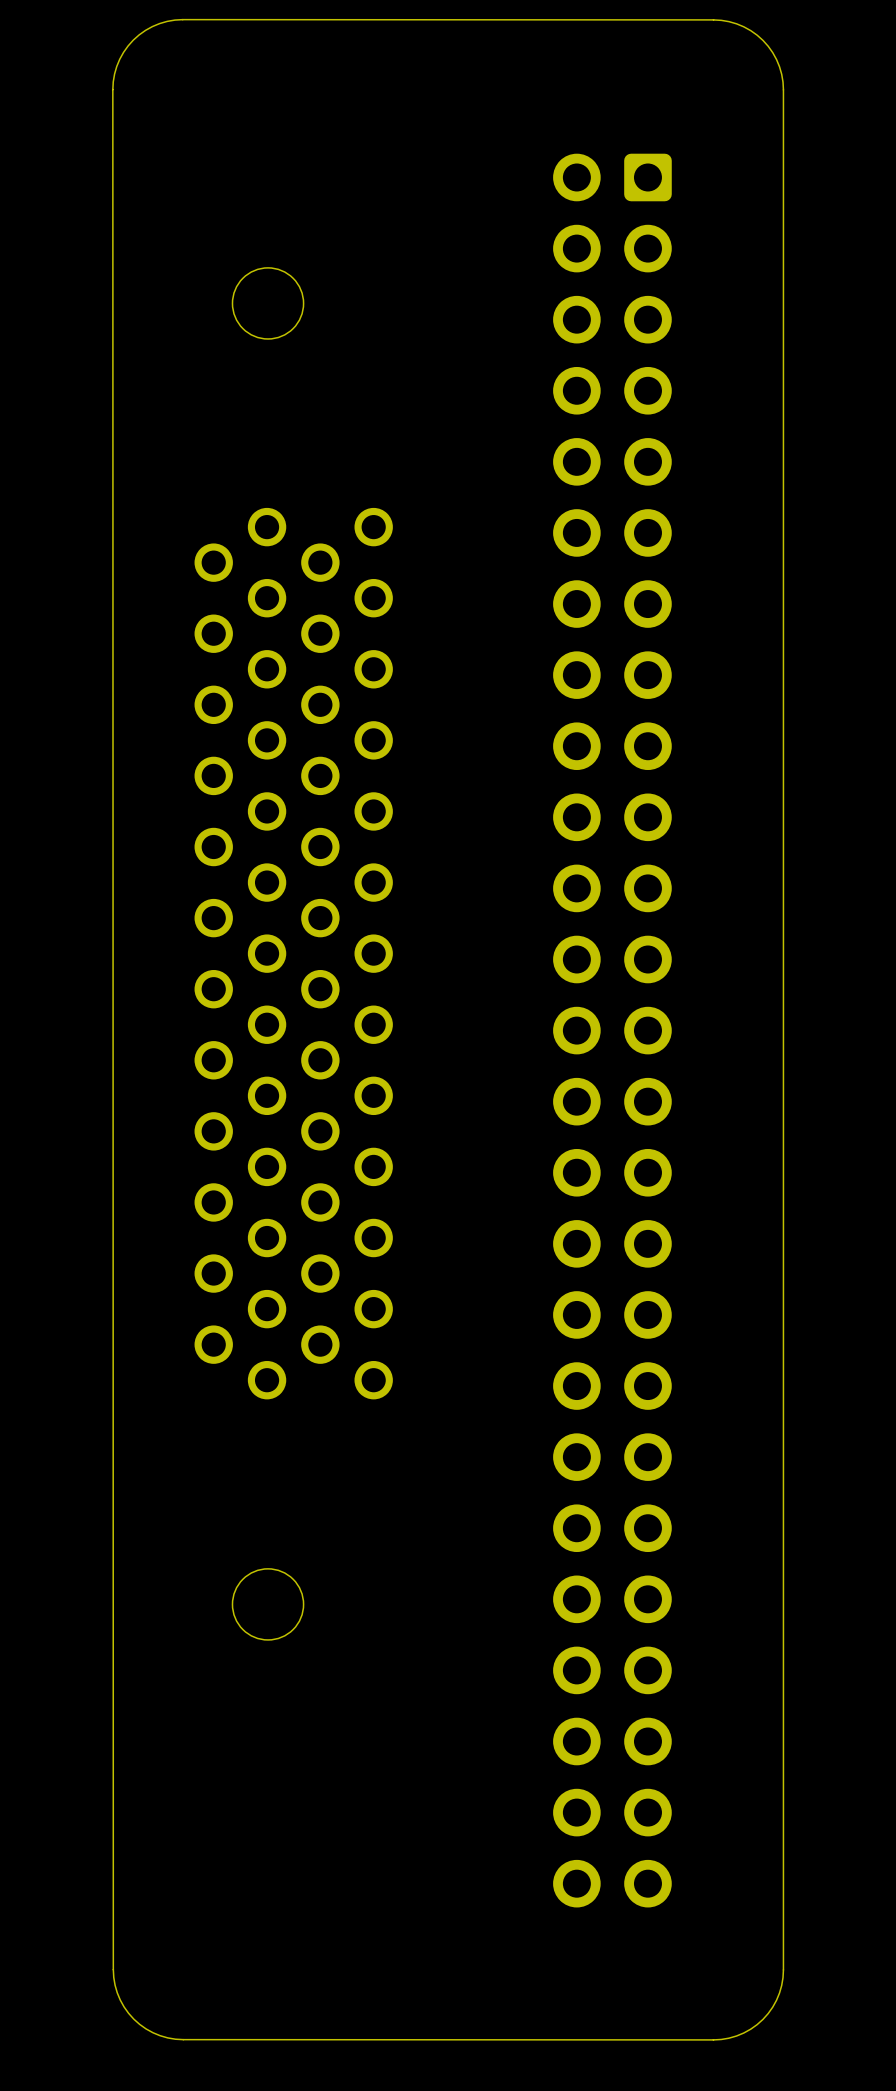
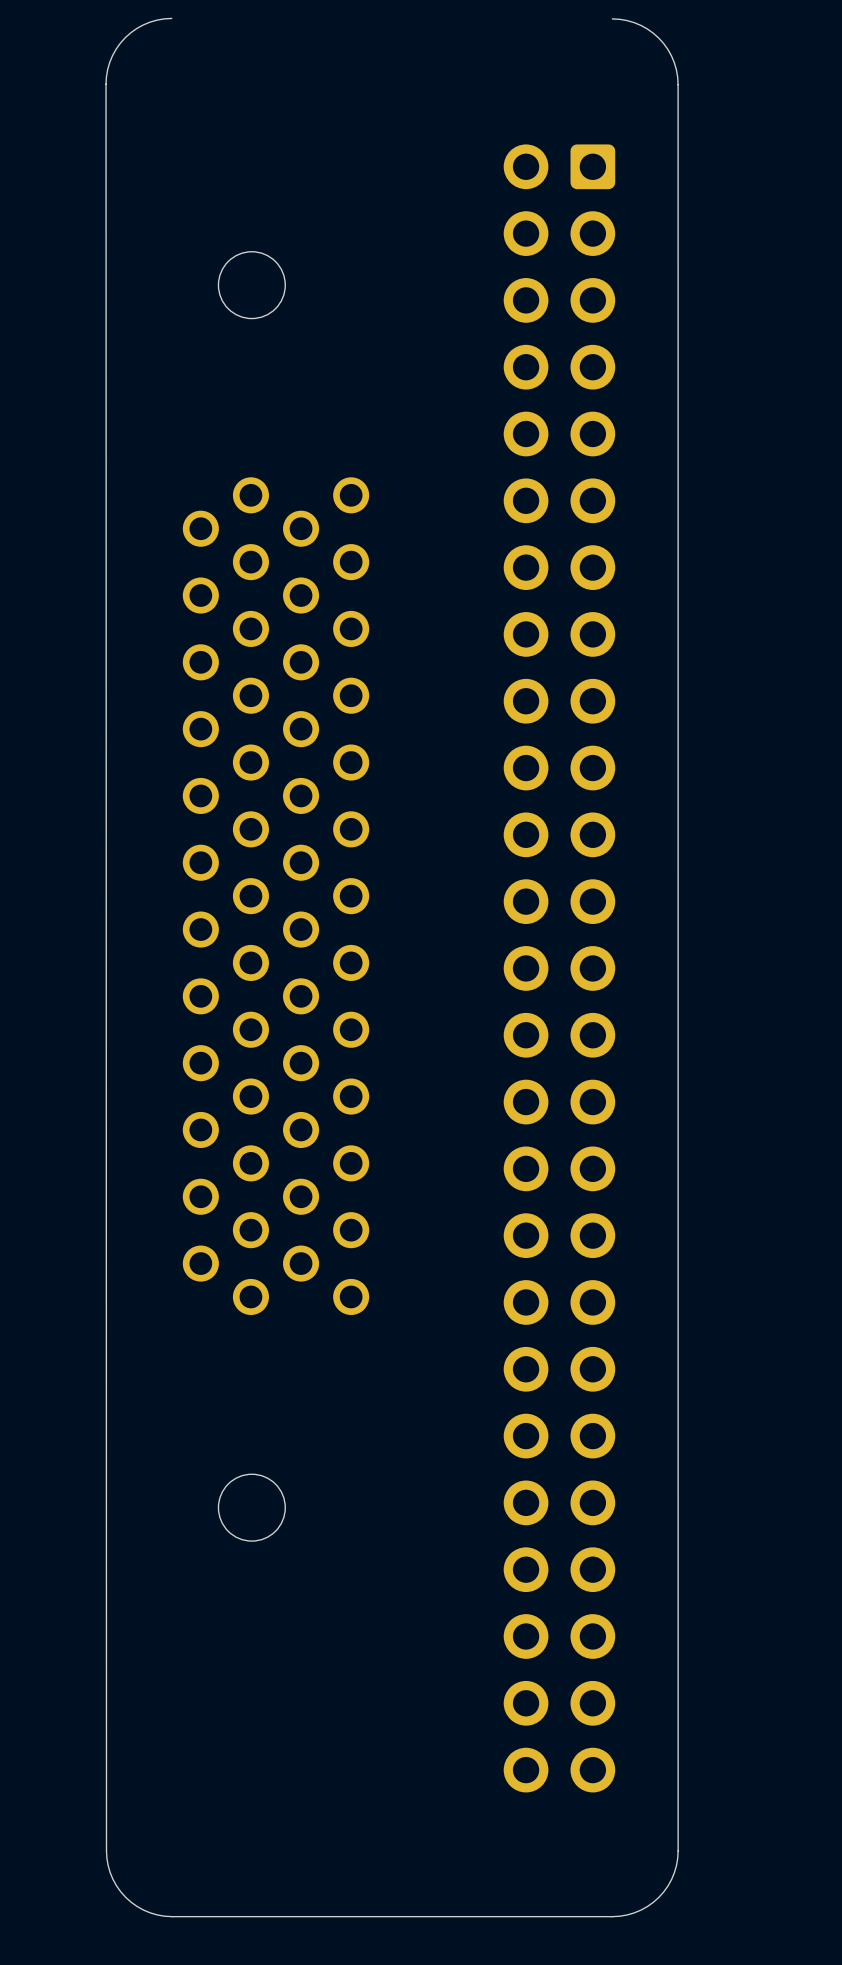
board edge: (182, 19) (721, 20) (743, 26) (762, 40) (776, 59) (781, 74) (783, 89) (783, 1969) (779, 1993) (772, 2007) (757, 2024) (736, 2036) (721, 2039) (183, 2039) -> (612, 18) (634, 22) (647, 28) (658, 38) (671, 56) (676, 70) (678, 84) (678, 1850) (676, 1865) (671, 1879) (658, 1897) (640, 1910) (619, 1916) (172, 1916)
part position: (612, 1030) -> (559, 968)

